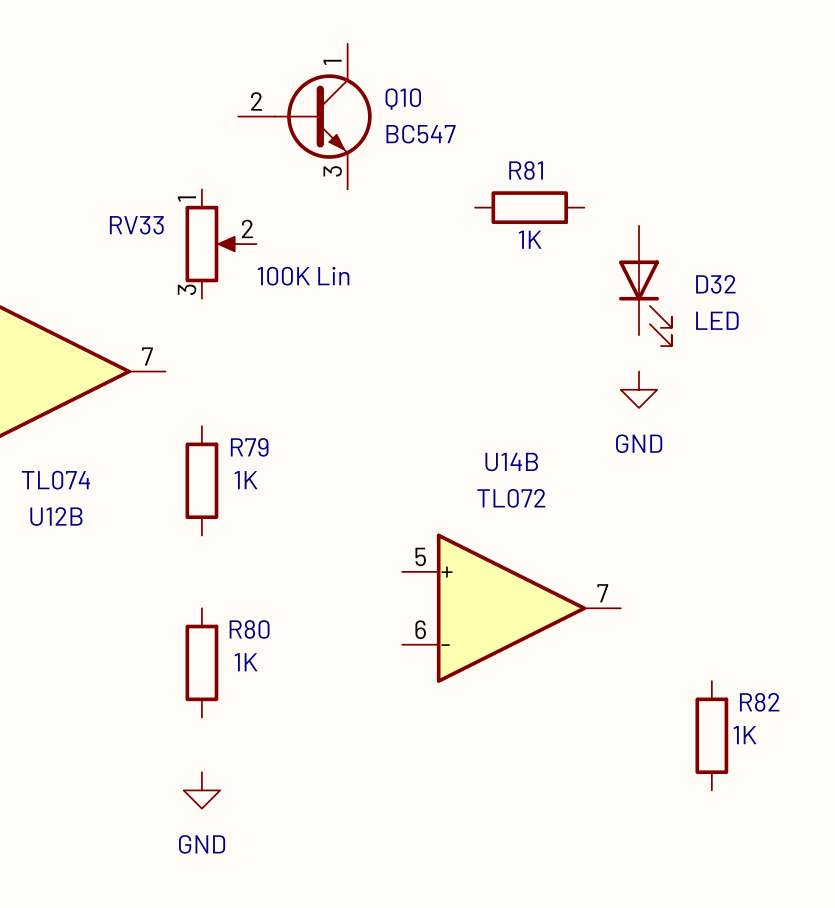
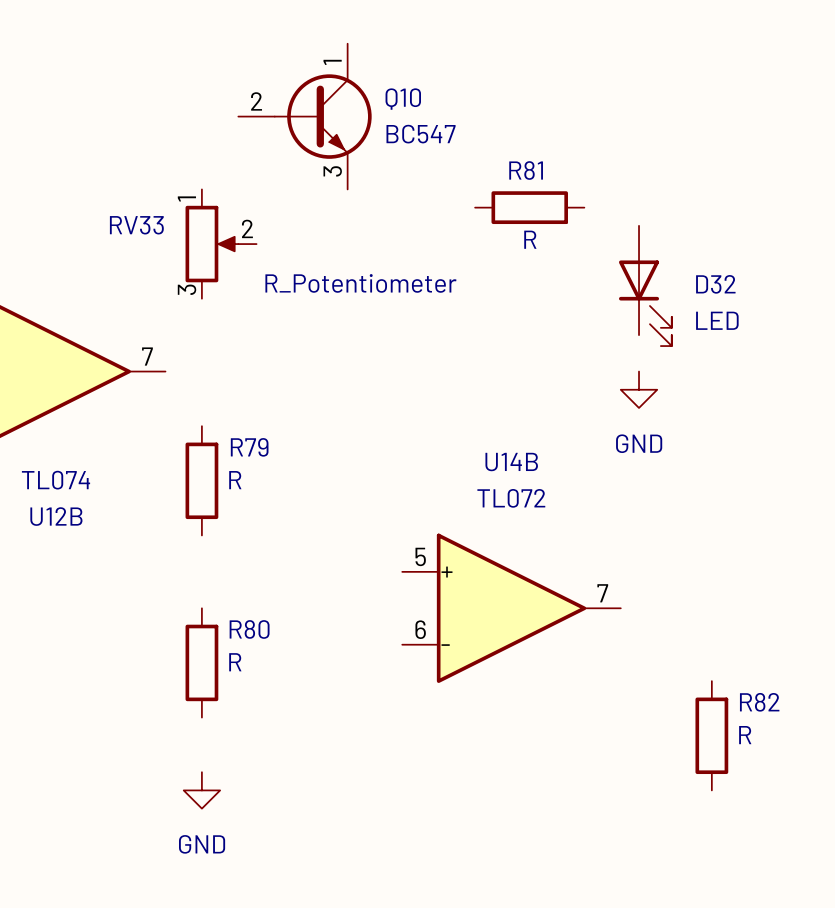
R81 value: 1K (530, 239) -> R (530, 239)
RV33 value: 100K Lin (303, 276) -> R_Potentiometer (360, 283)
R79 value: 1K (246, 480) -> R (235, 480)
R80 value: 1K (246, 662) -> R (235, 662)
R82 value: 1K (745, 735) -> R (745, 735)

